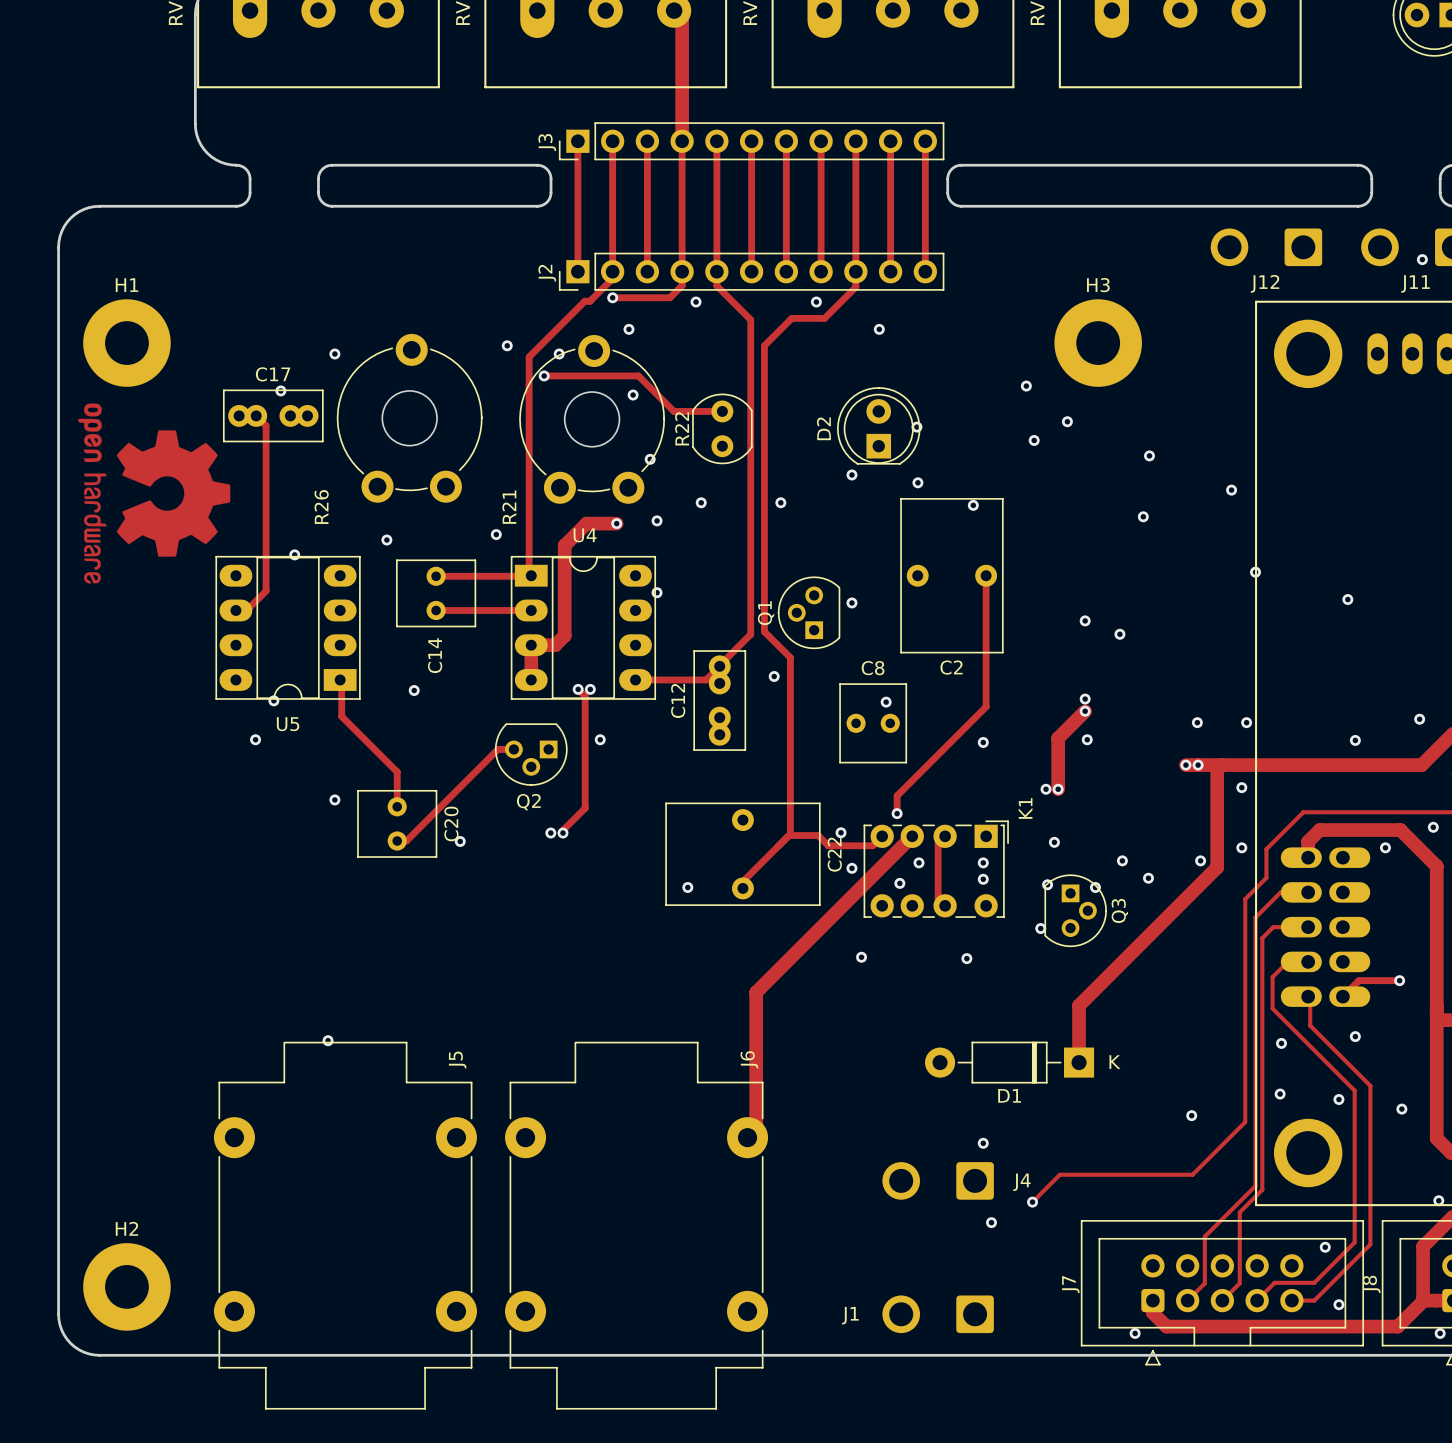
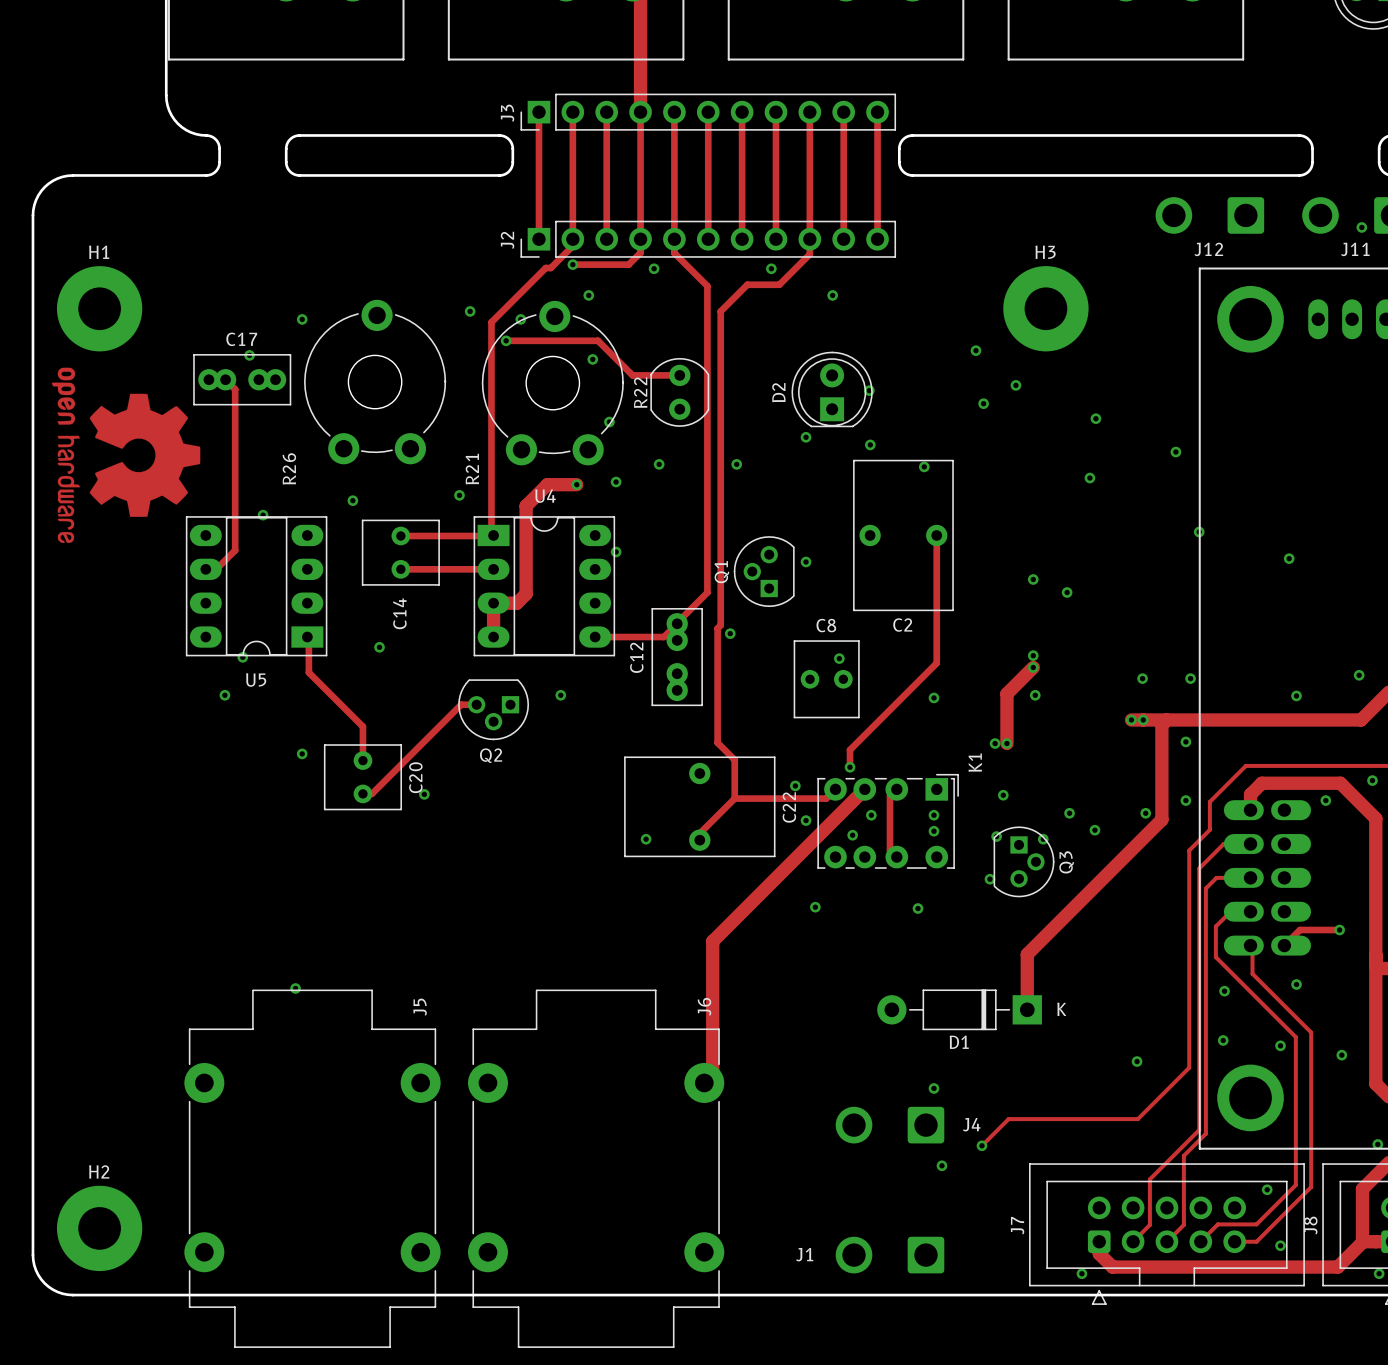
track: (764, 631) (790, 657) (790, 834) (778, 845) -> (720, 589) (720, 625) (717, 628) (717, 742) (734, 759) (734, 798) (783, 798)
track: (578, 689) (585, 696) (585, 808) (562, 830) (562, 833) -> none
via: (578, 689) -> none
via: (590, 689) -> none
via: (550, 833) -> none
via: (562, 833) -> none
track: (789, 835) (818, 835) (828, 845) -> none

